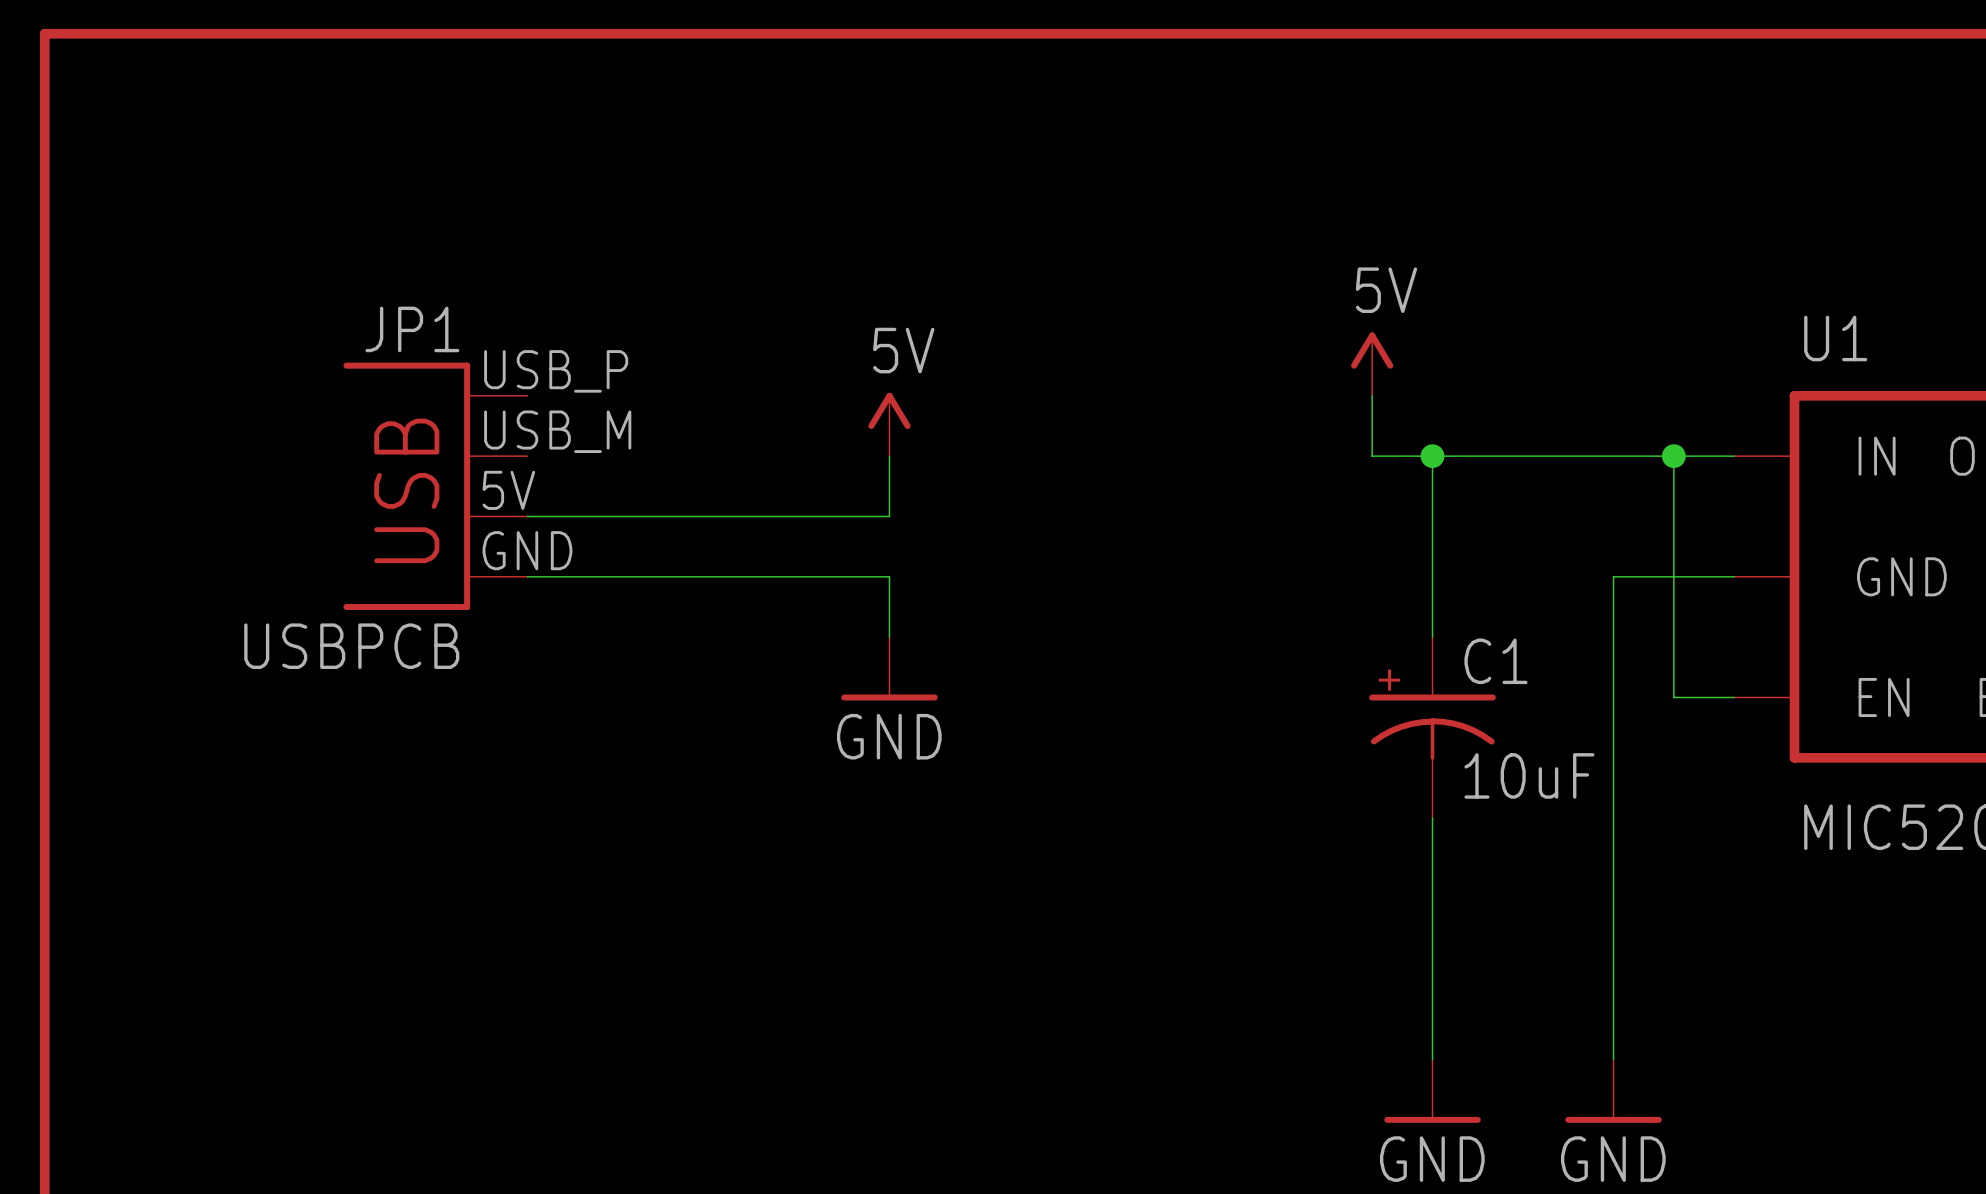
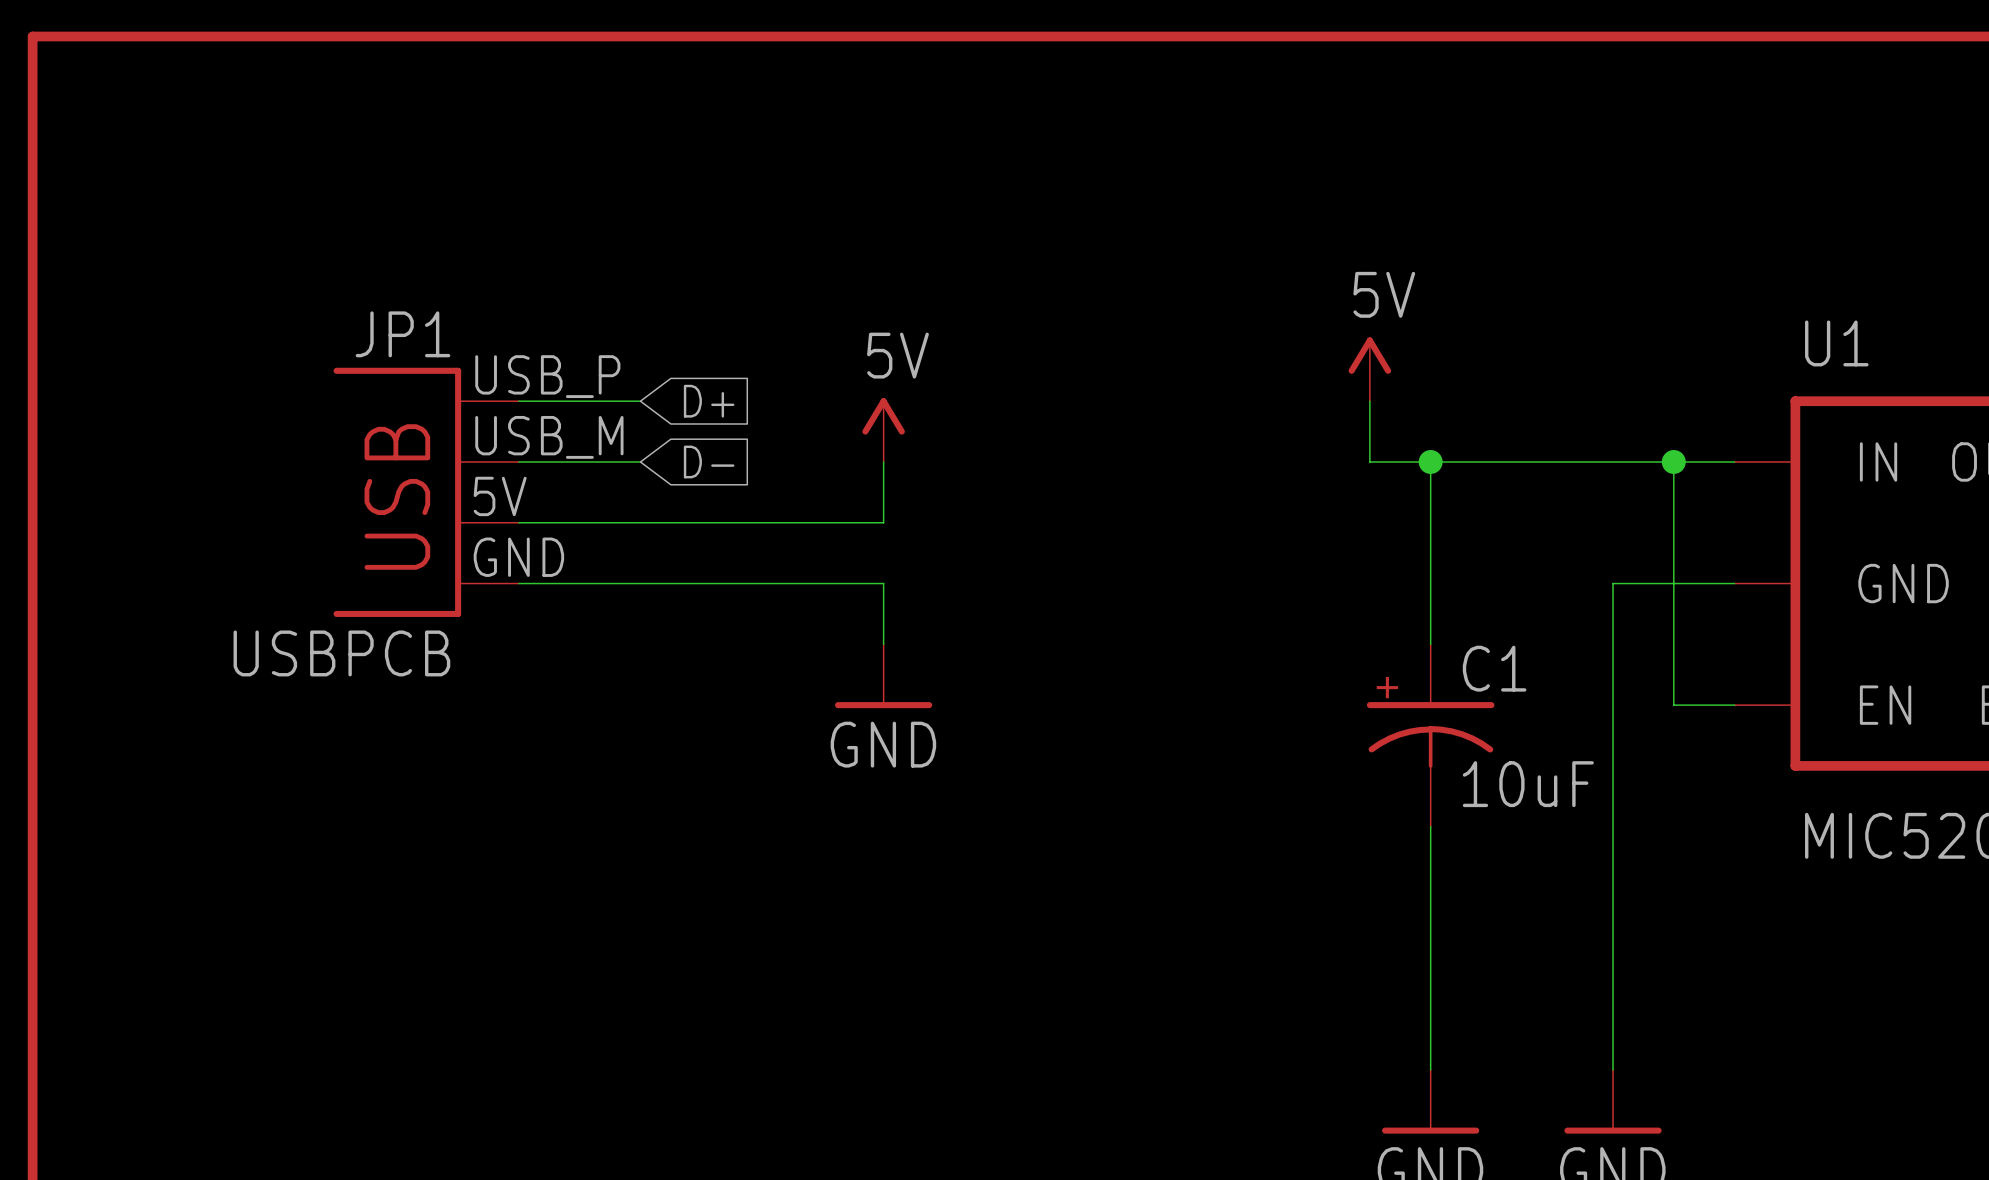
wire: none -> (518, 401) (640, 401)
global label: none -> D+ (709, 401)
wire: none -> (518, 461) (640, 461)
global label: none -> D- (709, 461)

